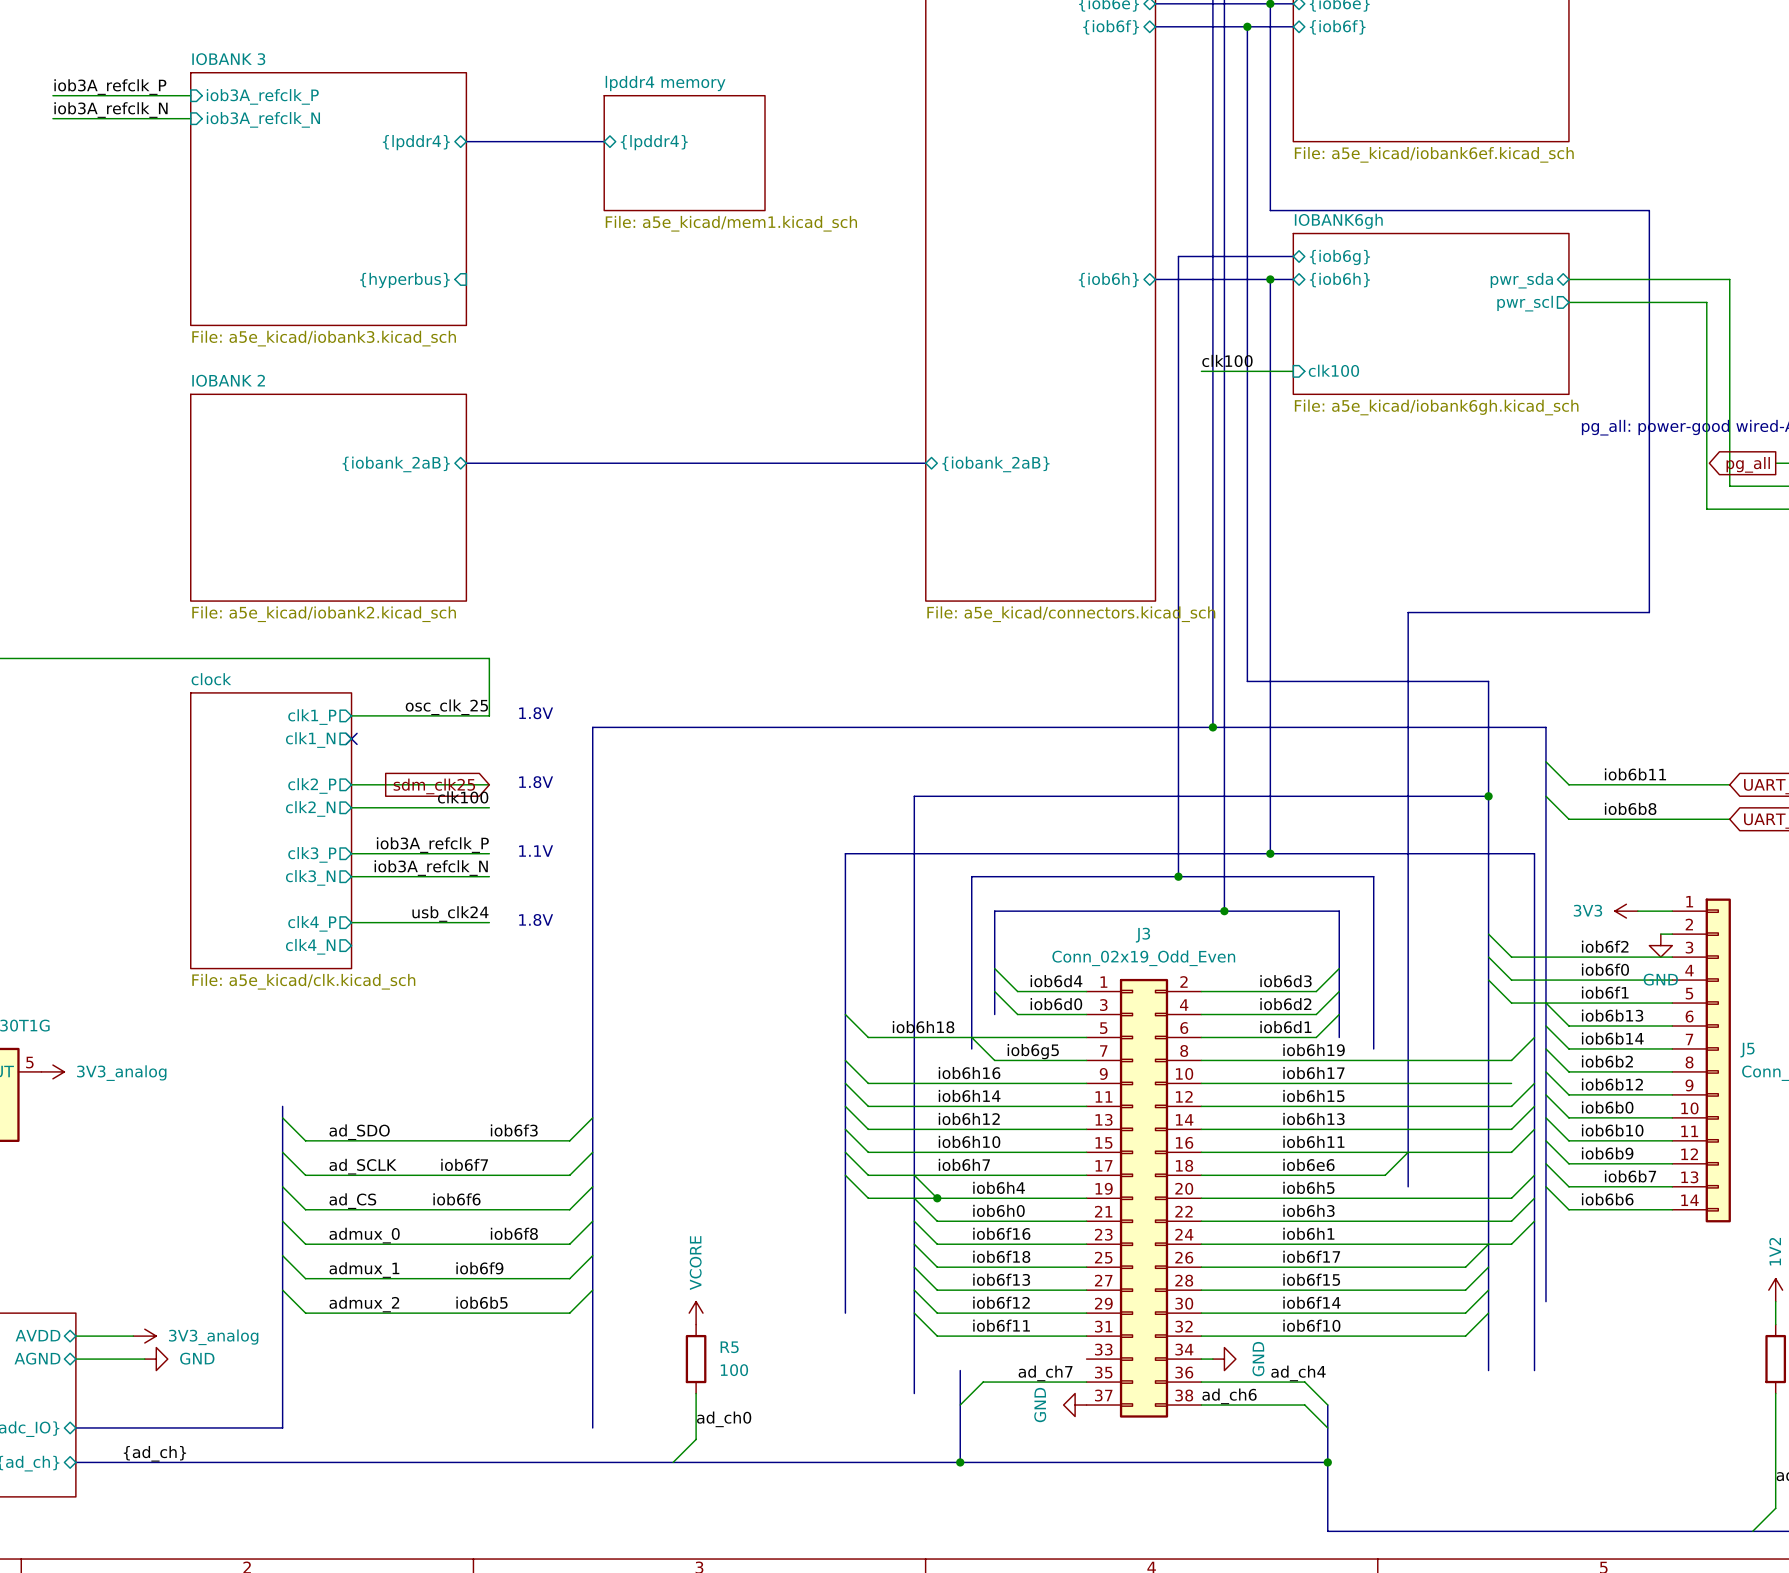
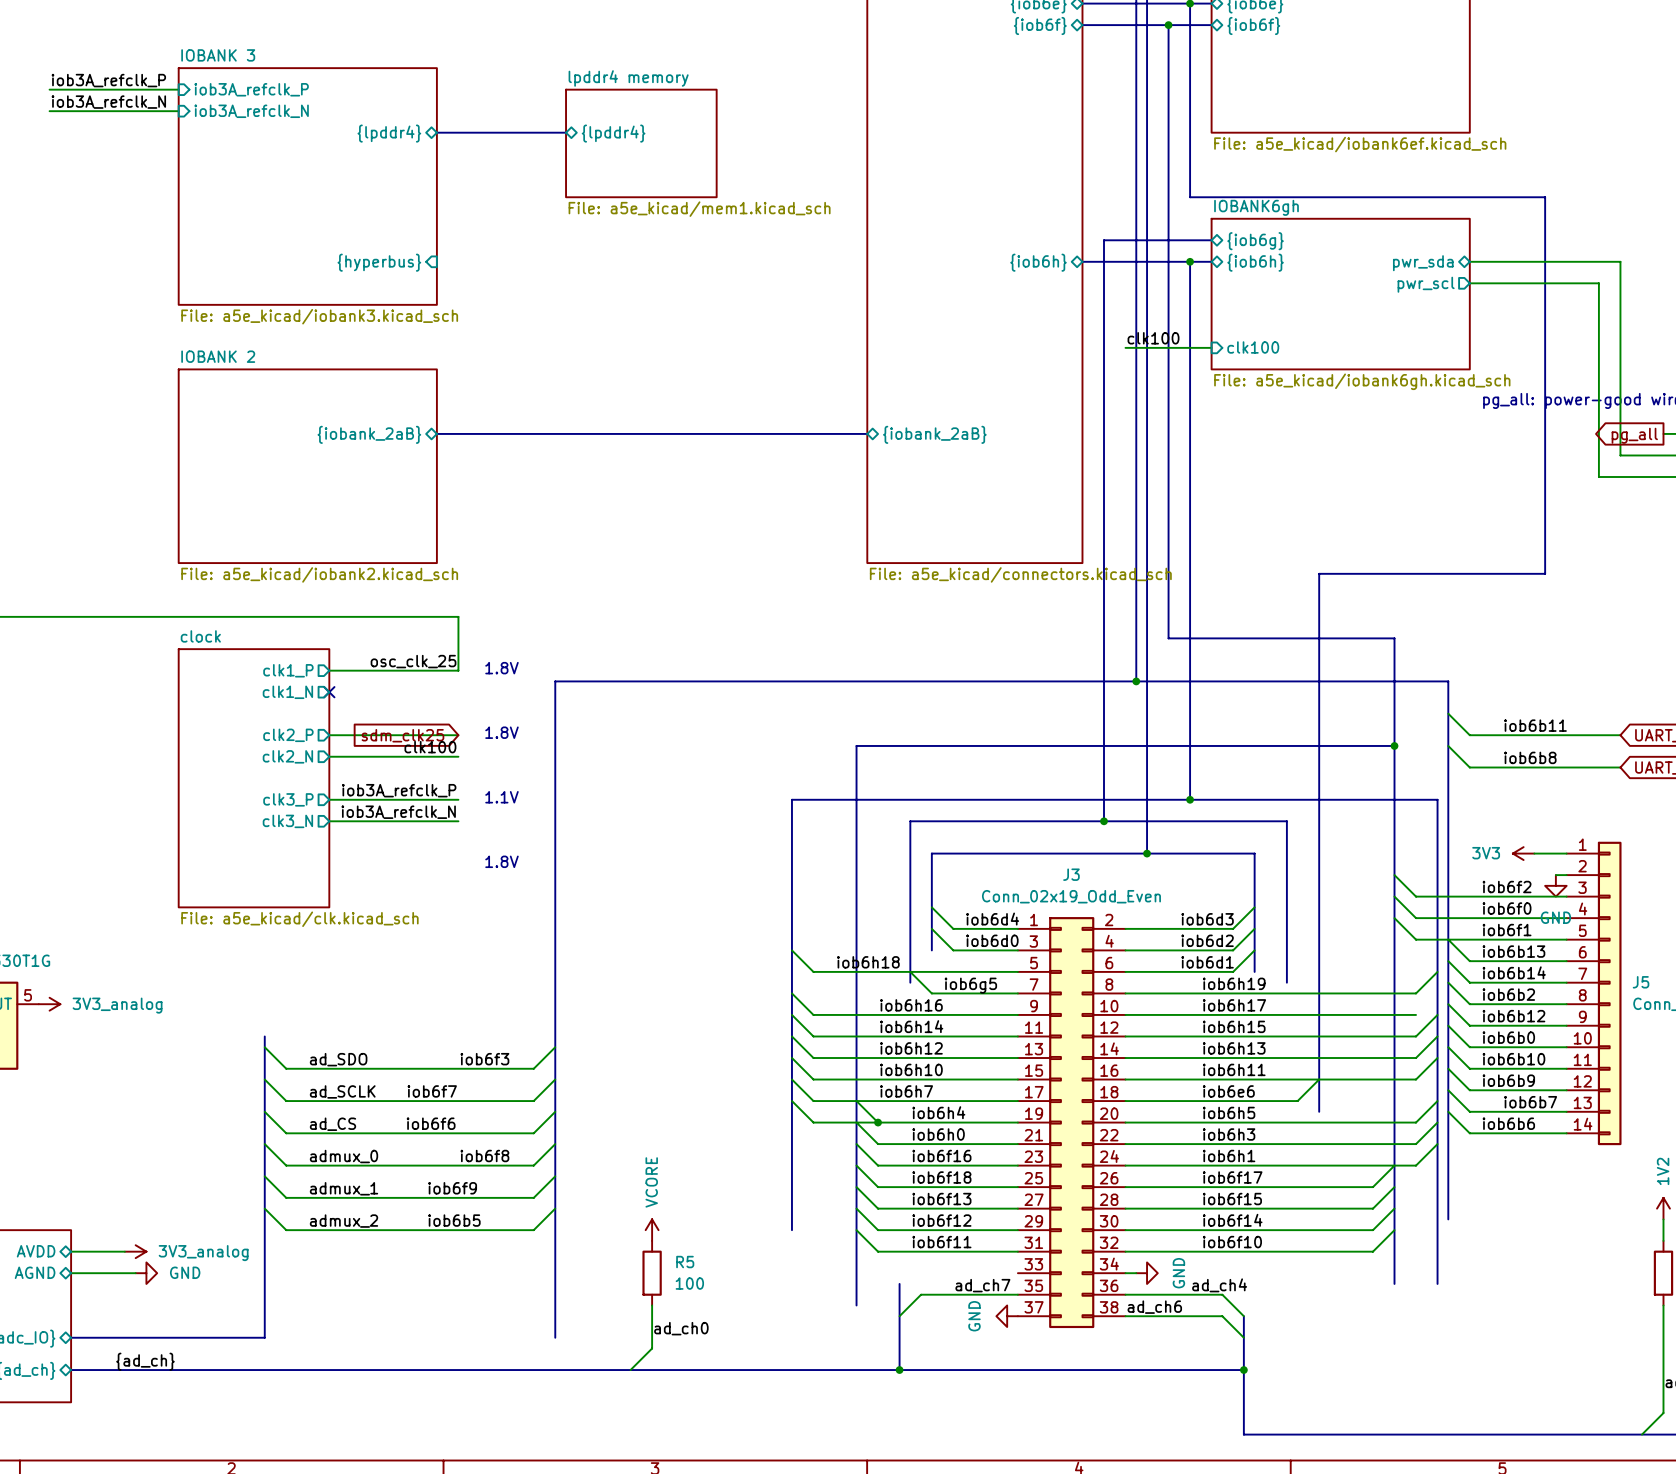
label: usb_clk24 (450, 914) -> none
wire: (351, 922) (489, 922) -> none
sheet pin: clk4_P (312, 923) -> none
sheet pin: clk4_N (310, 946) -> none

